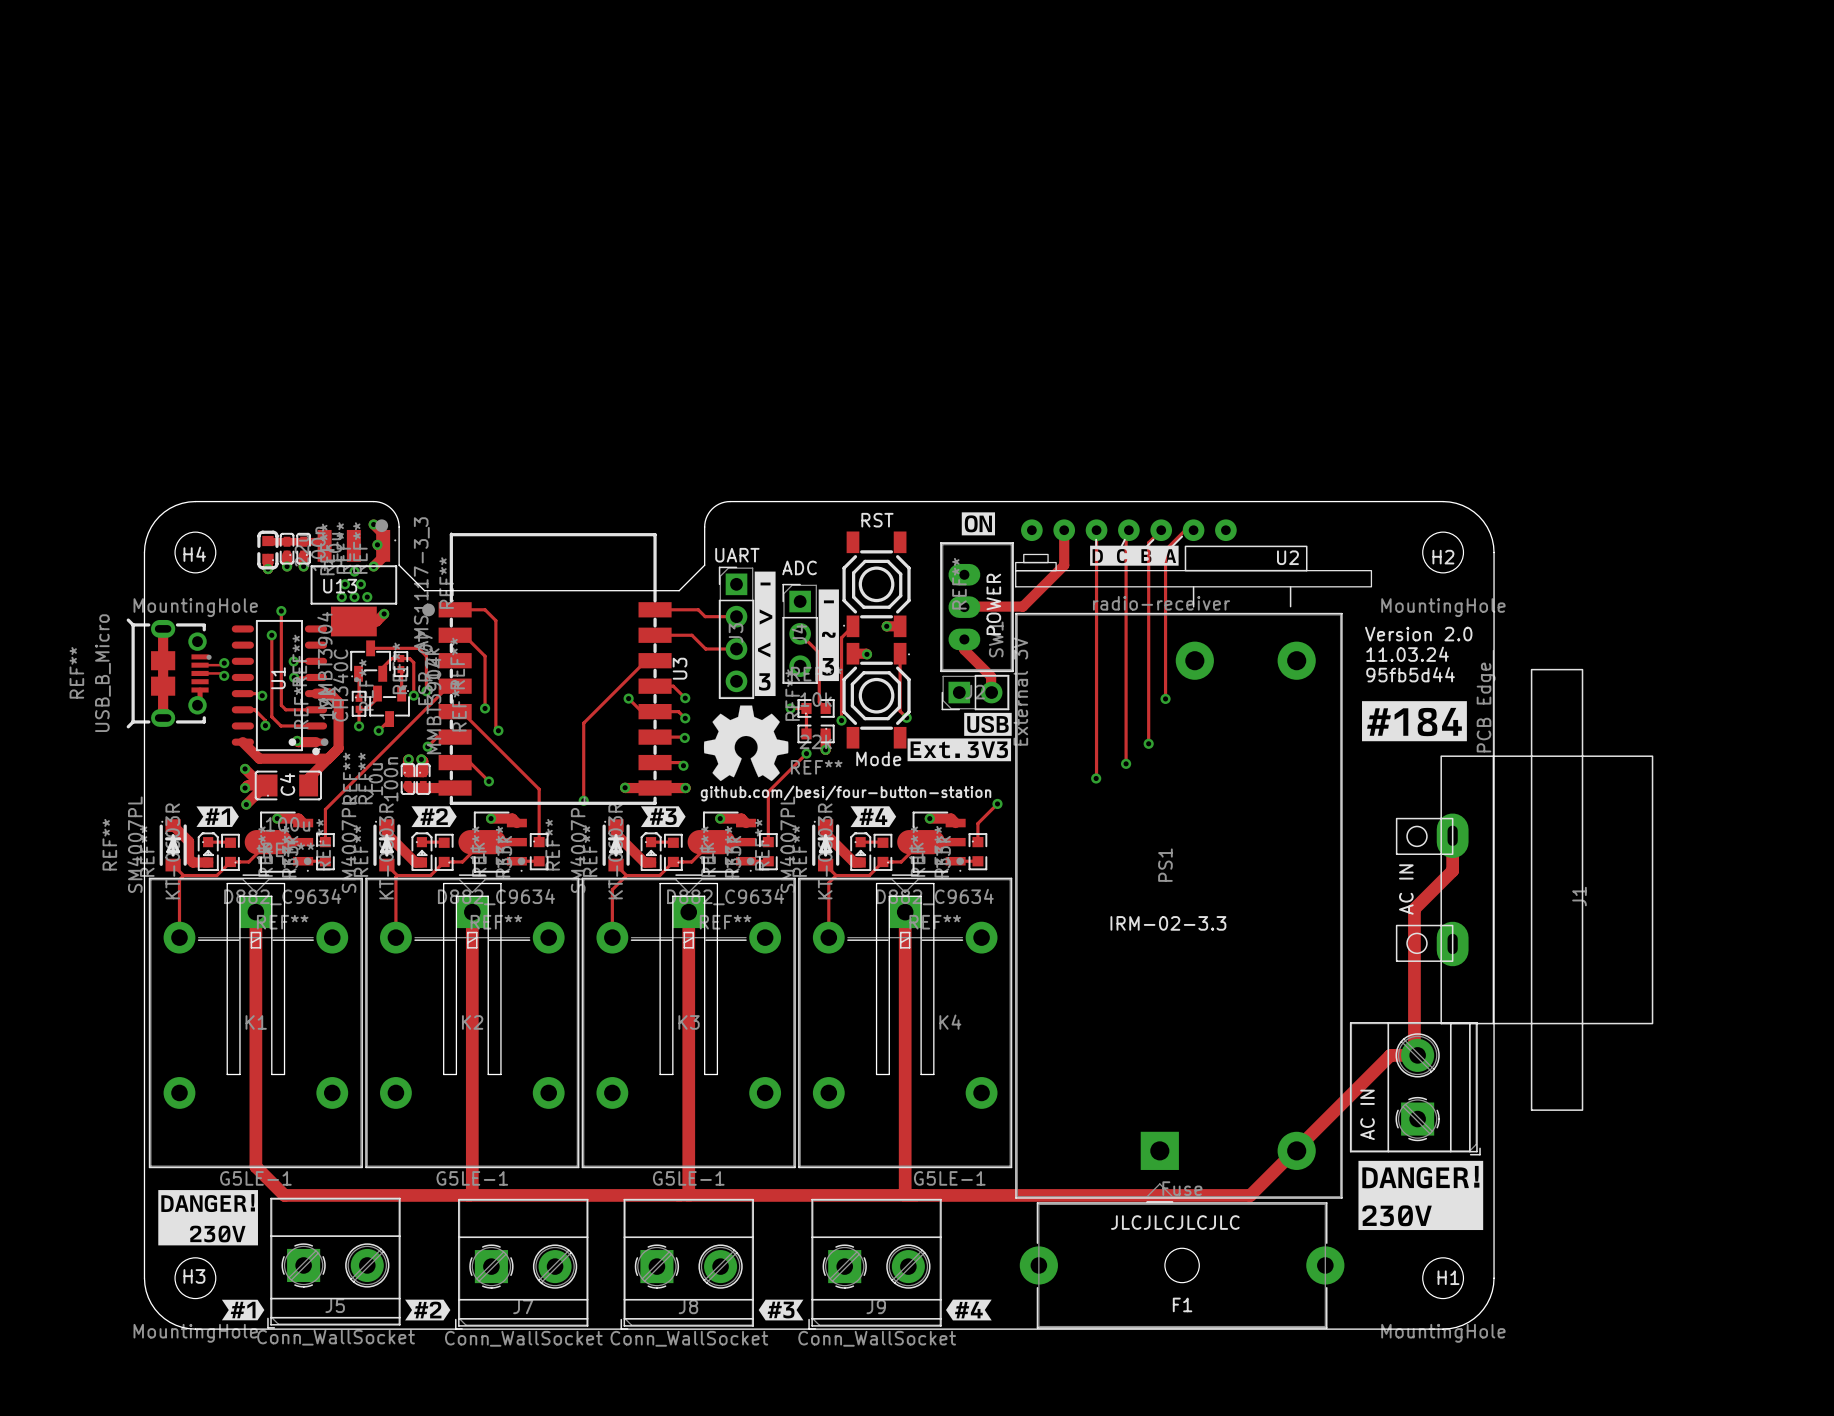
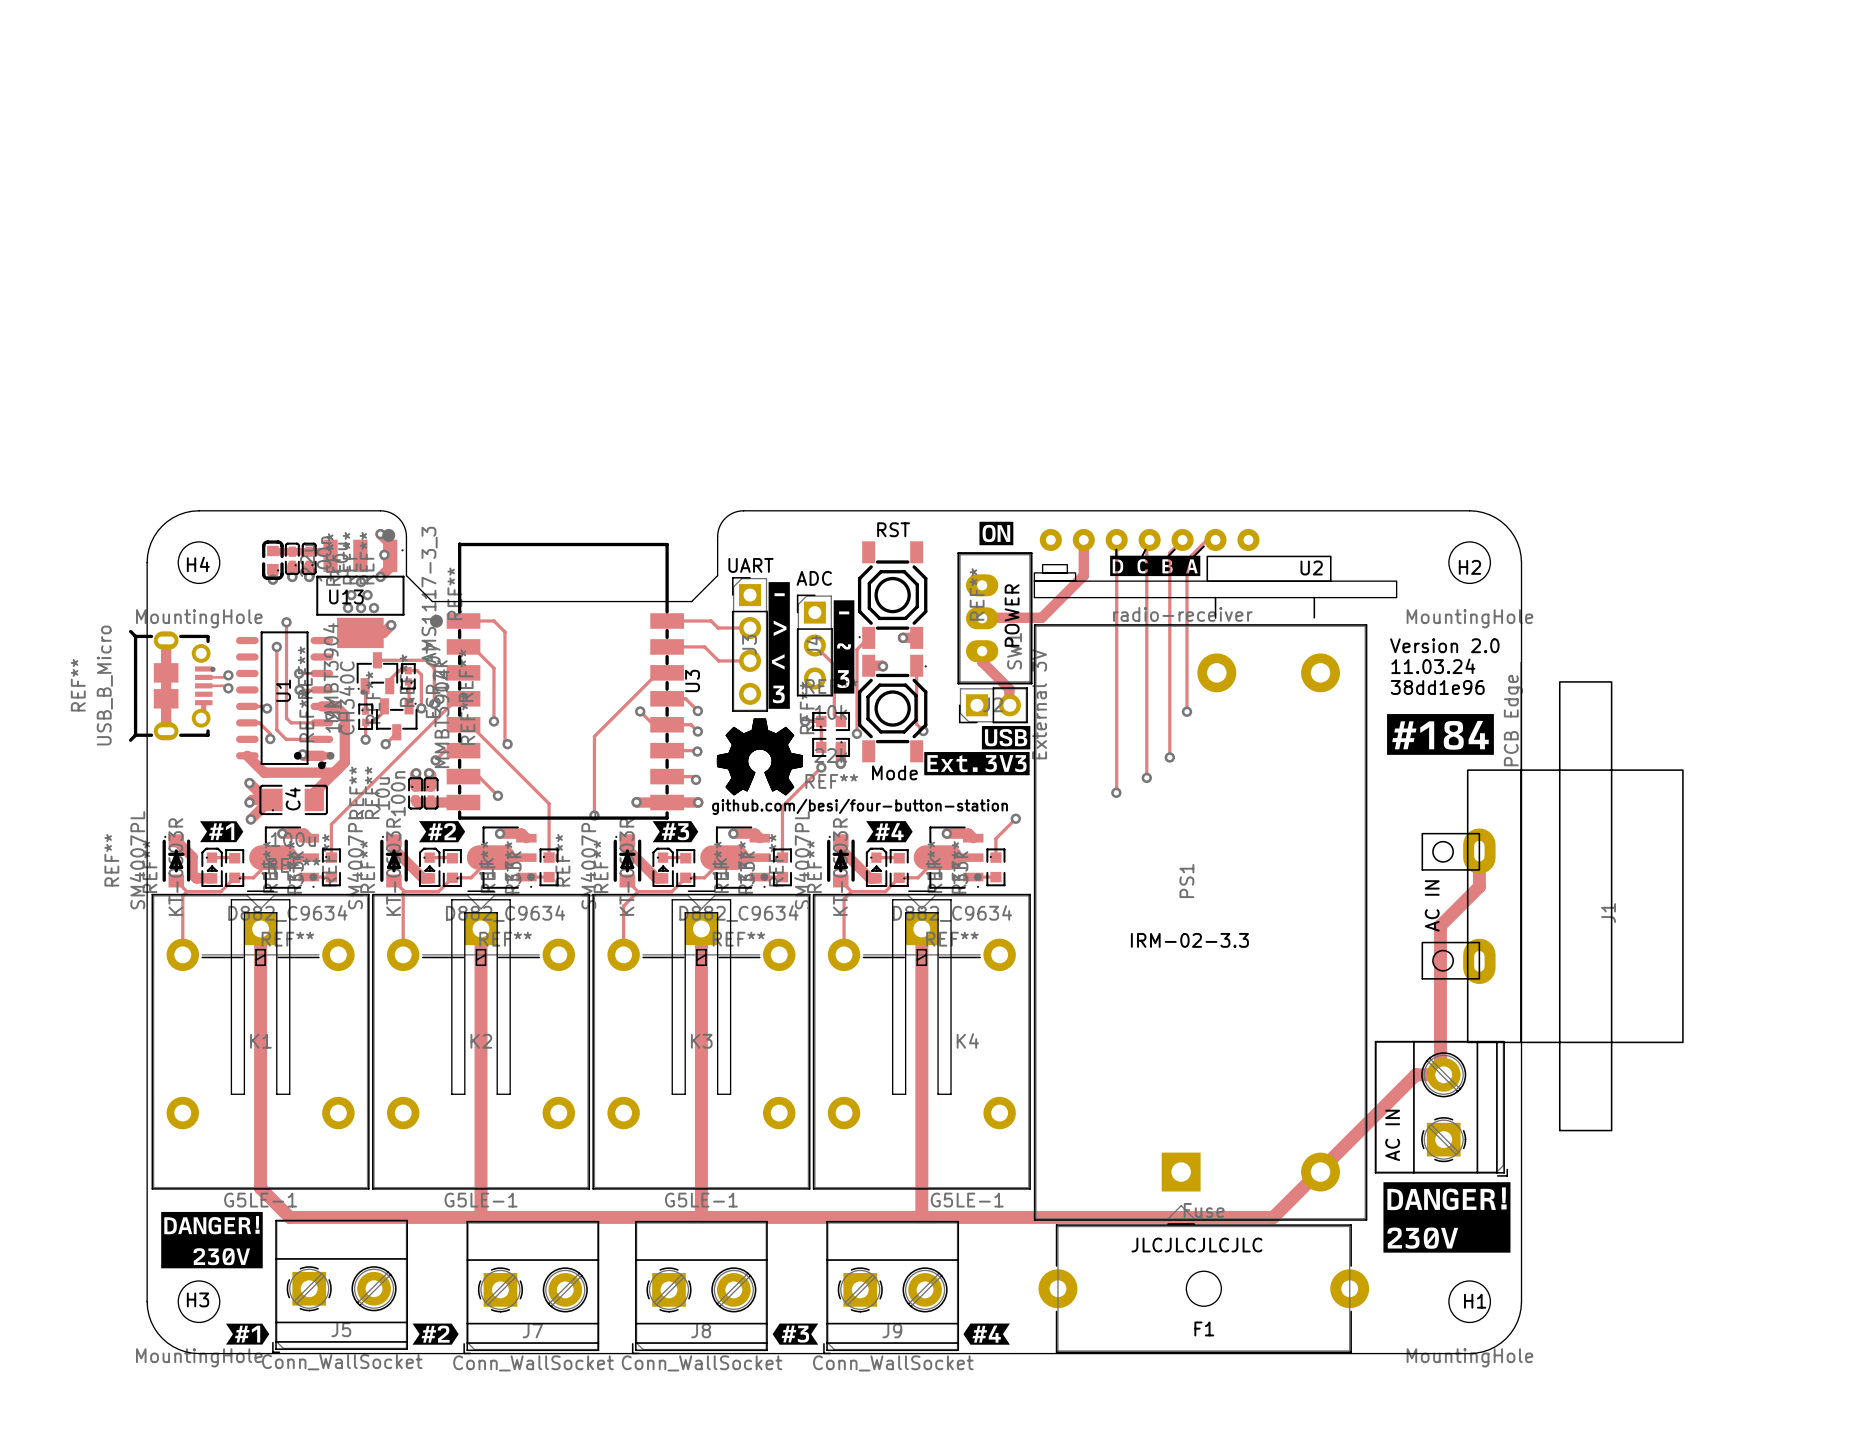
text: 95fb5d44 (1410, 674) -> 38dd1e96 (1437, 687)
drawing: [703, 705, 789, 782] -> none
drawing: none -> [716, 718, 803, 796]

